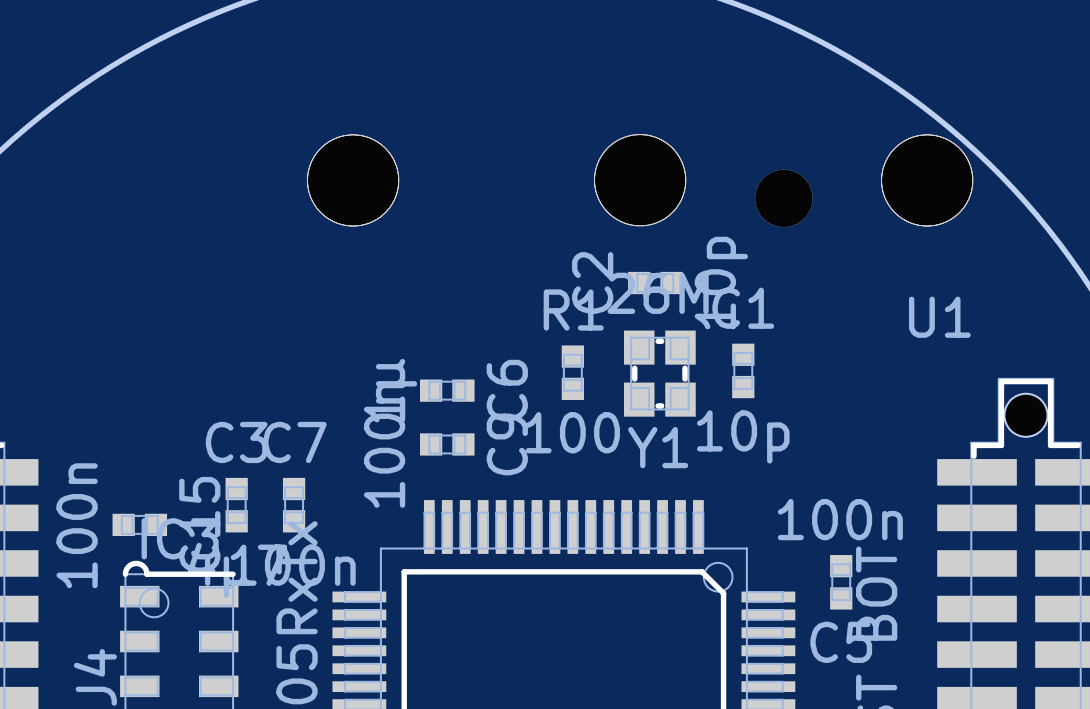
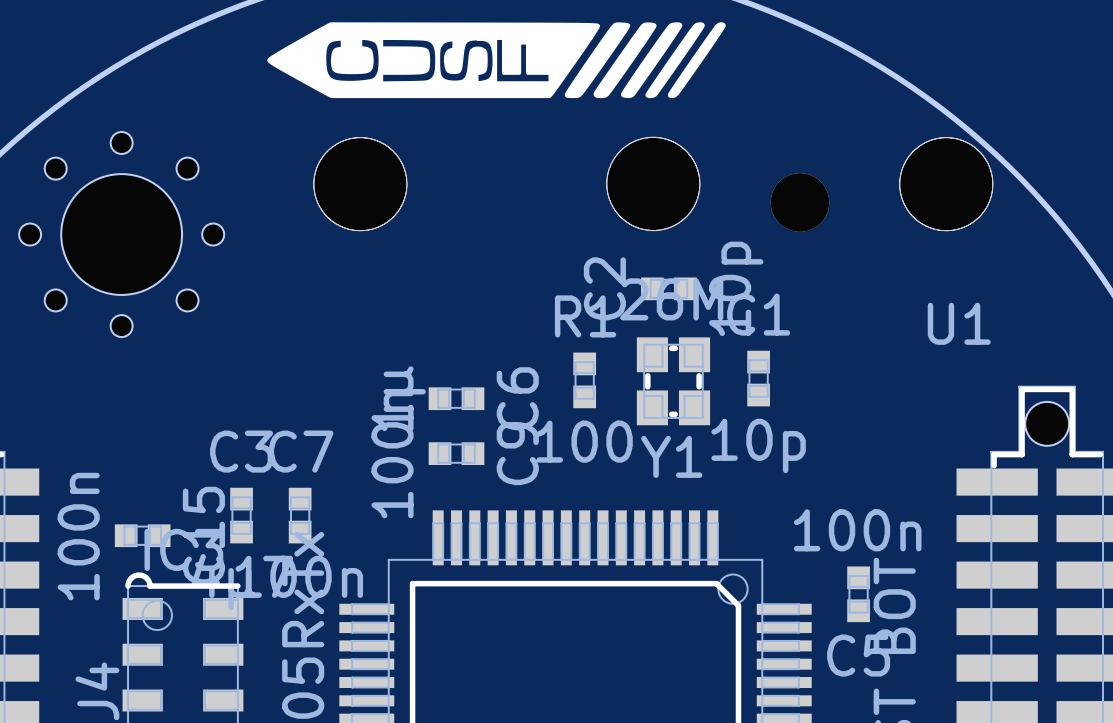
drawing: none -> [267, 22, 726, 99]
part: none -> (121, 234)

